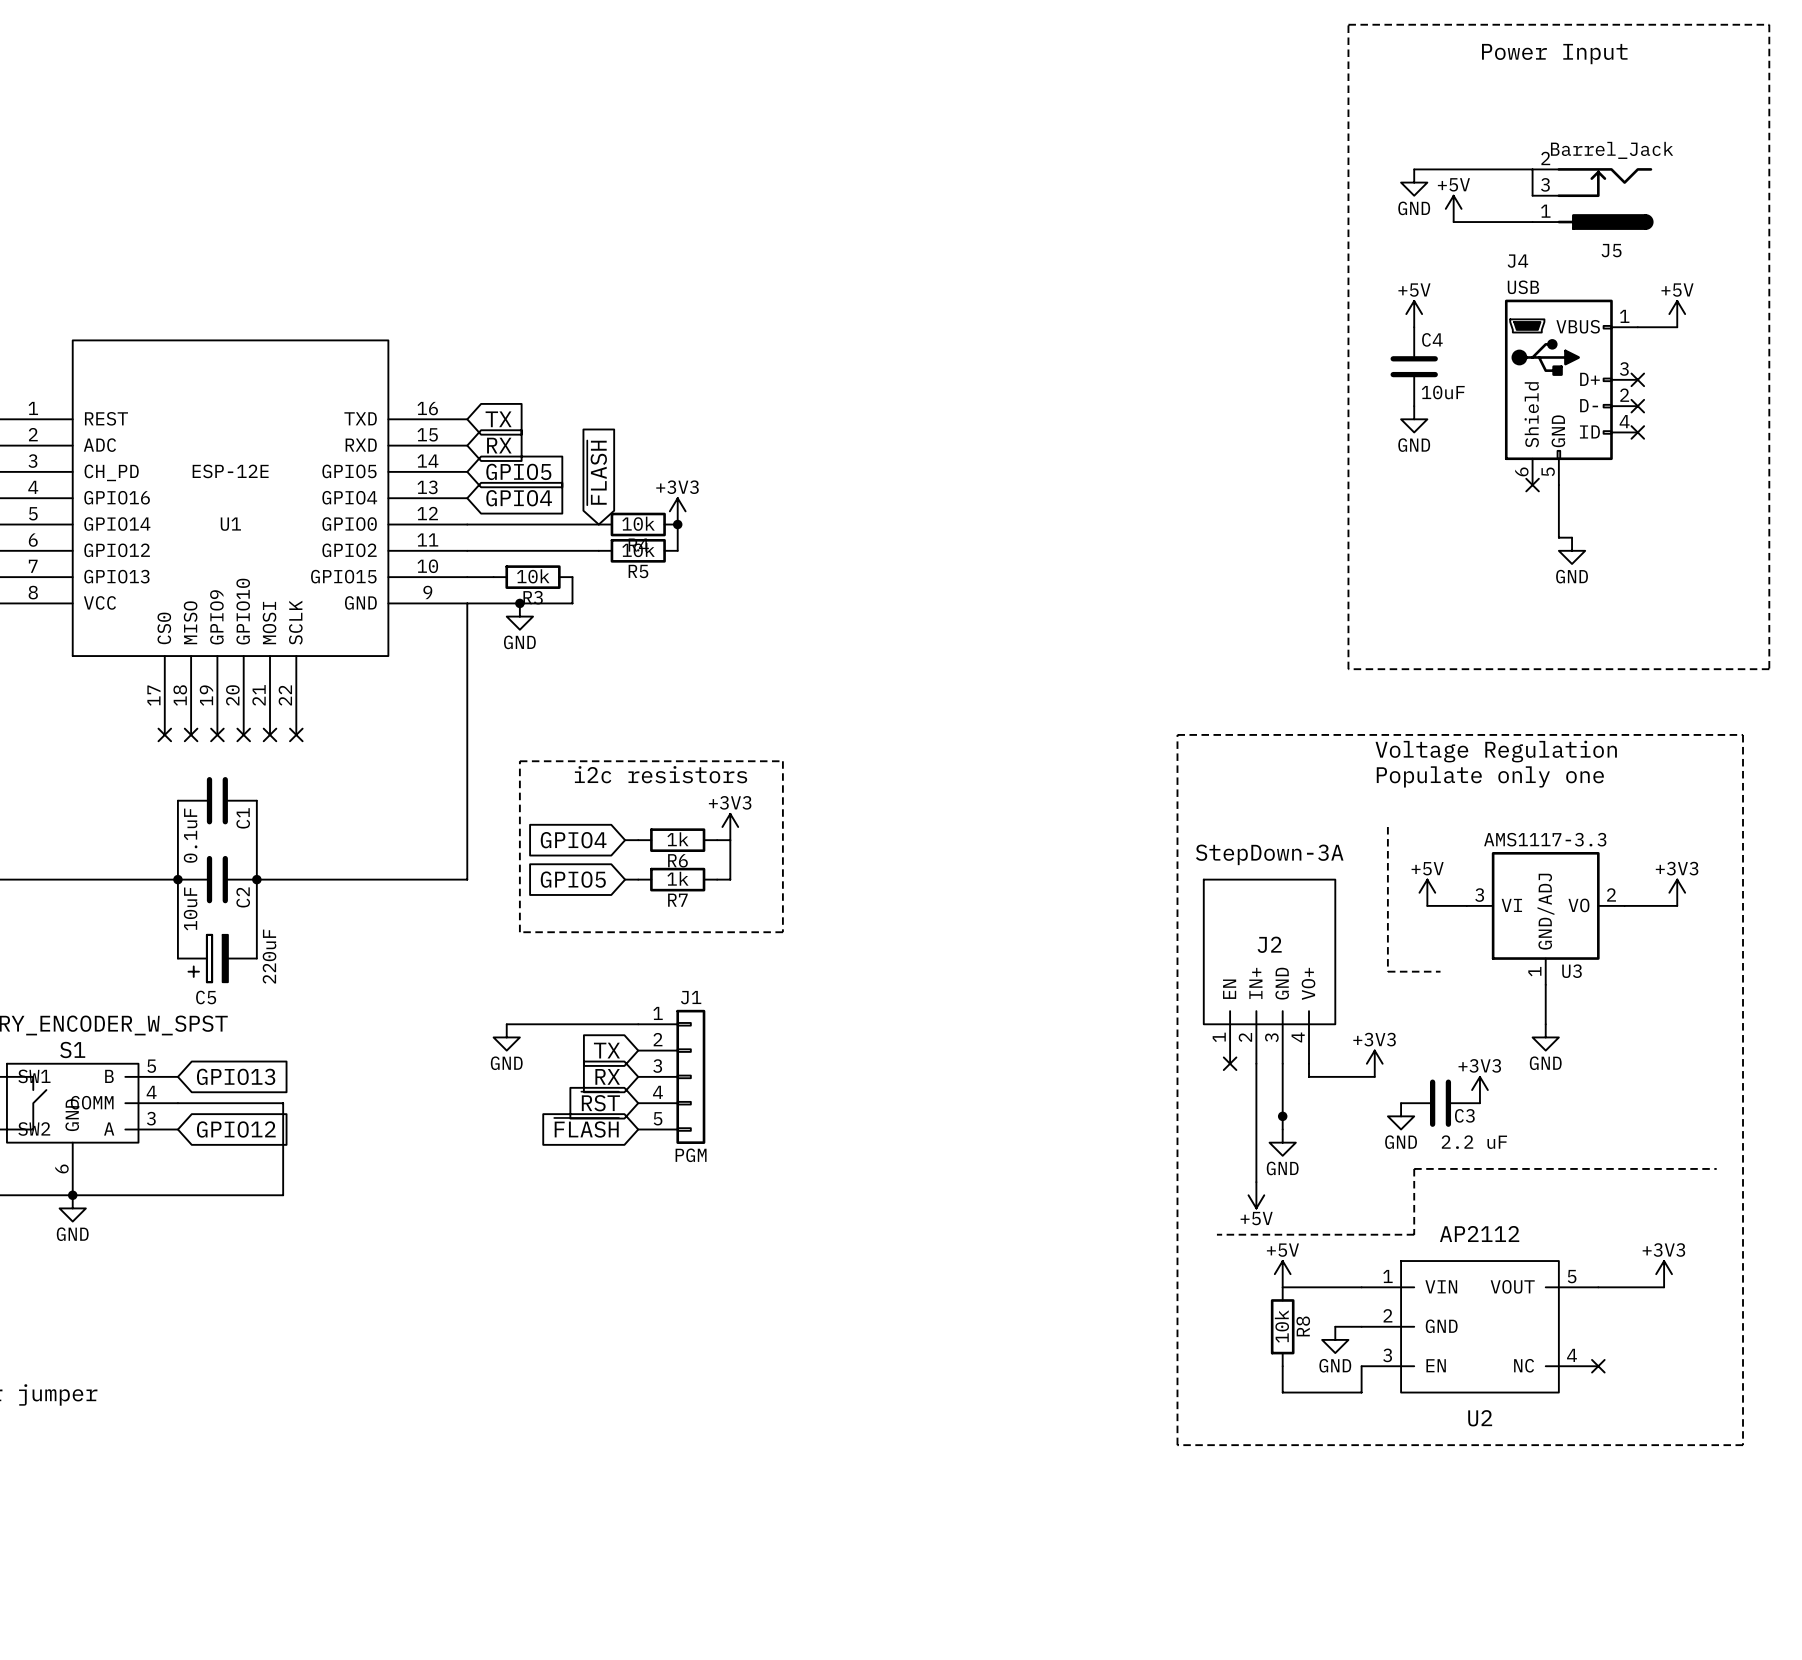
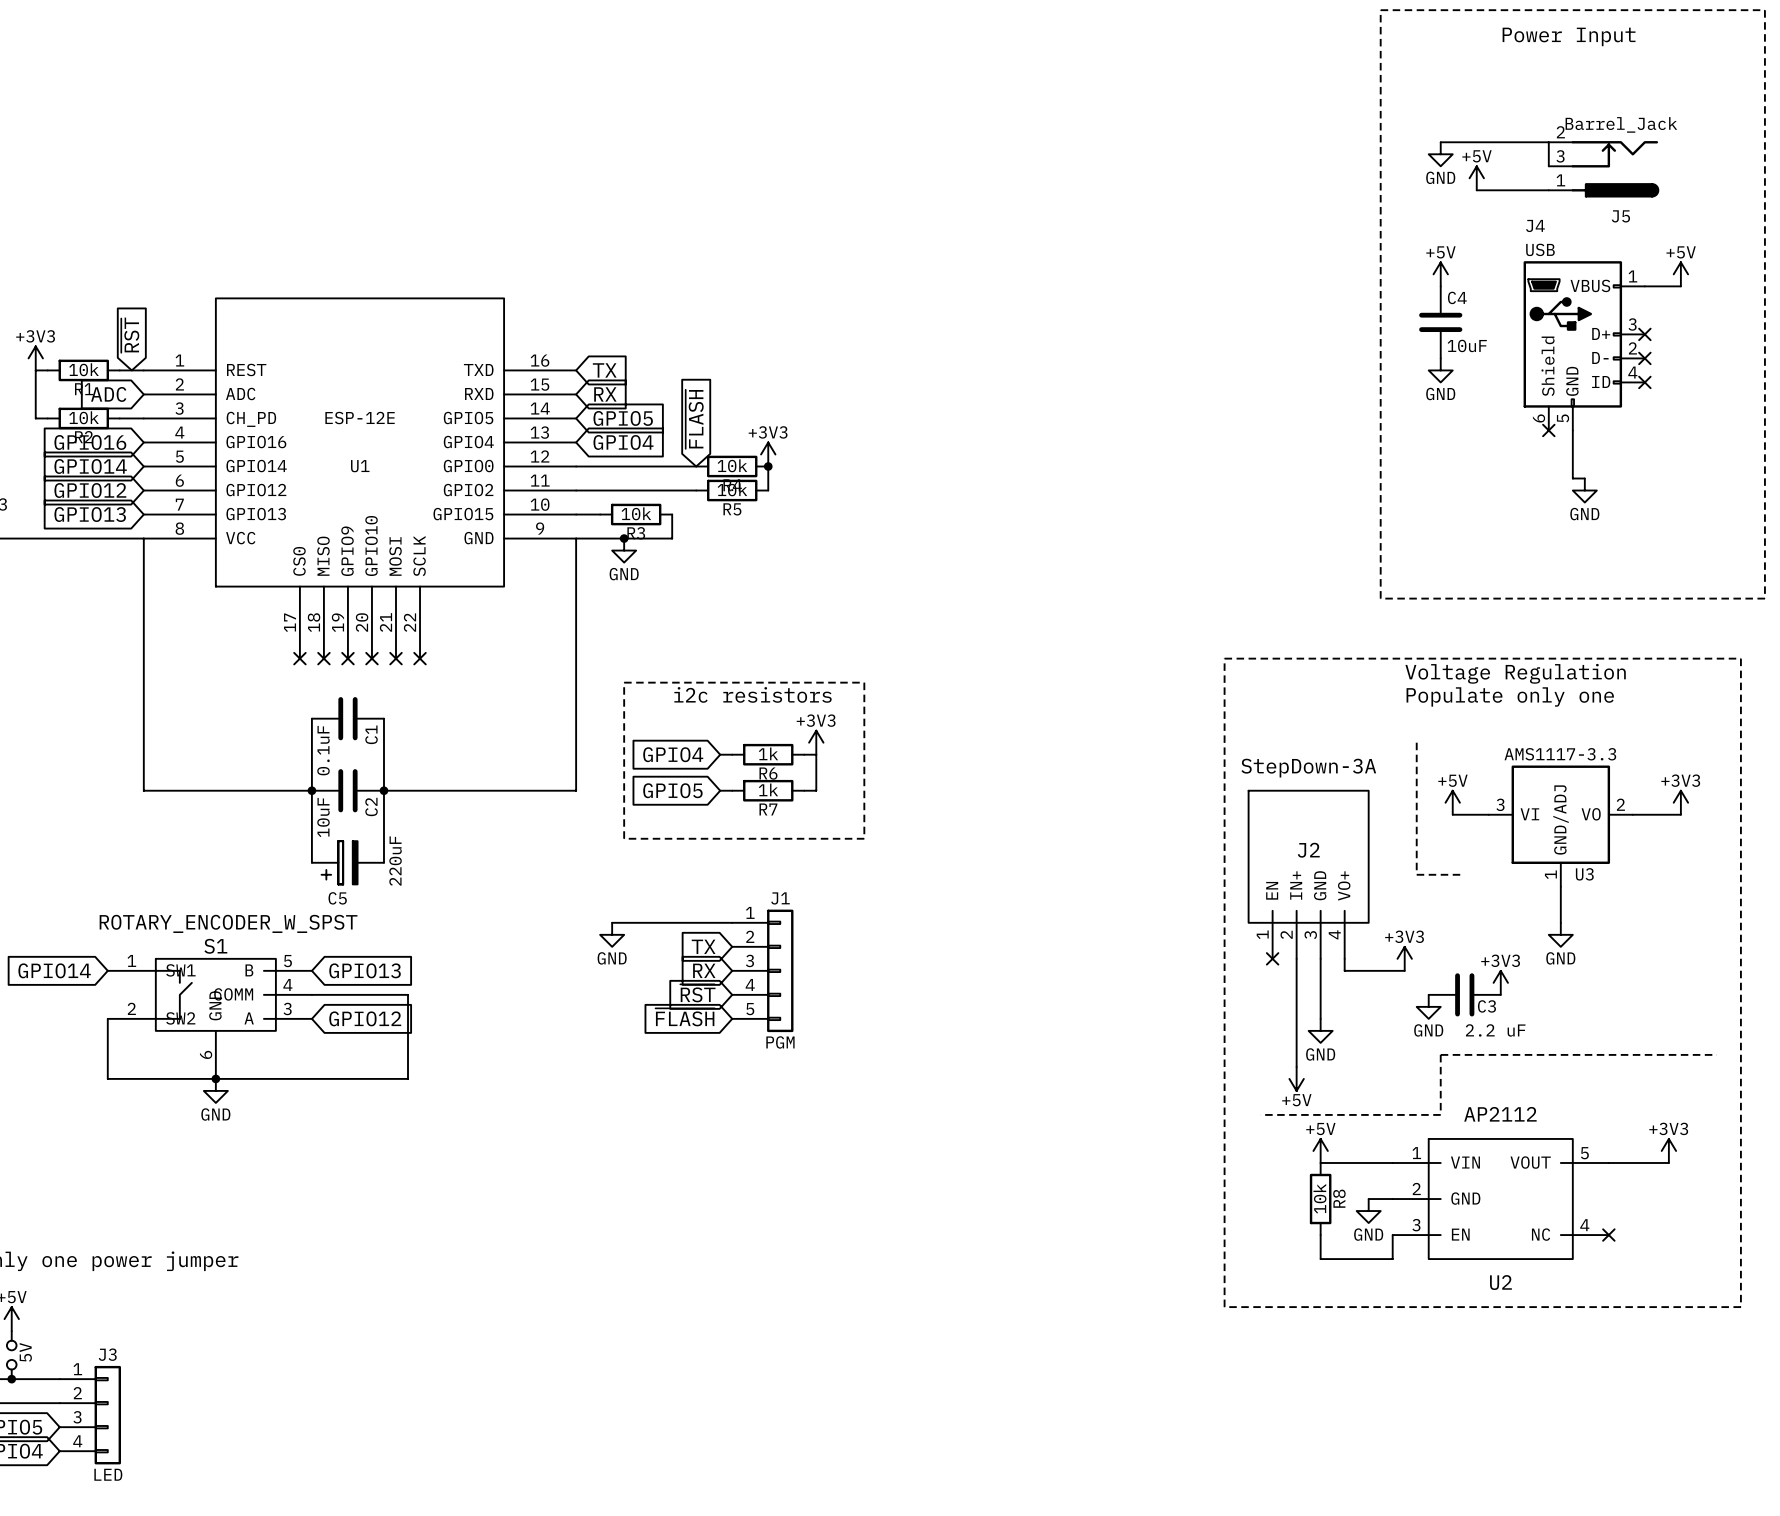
junction: (1282, 1116) -> none

